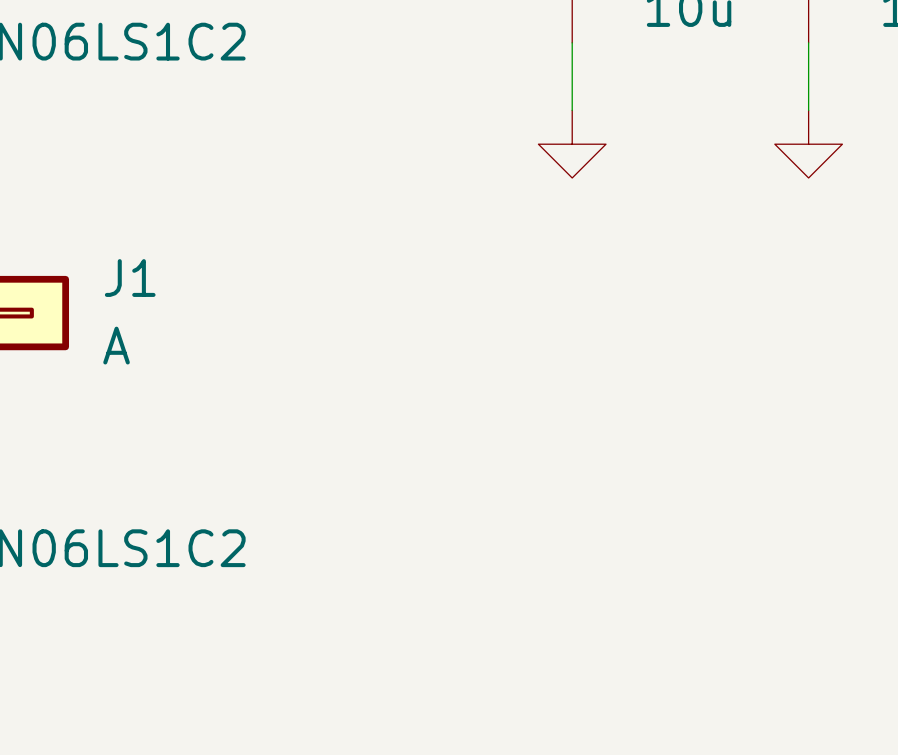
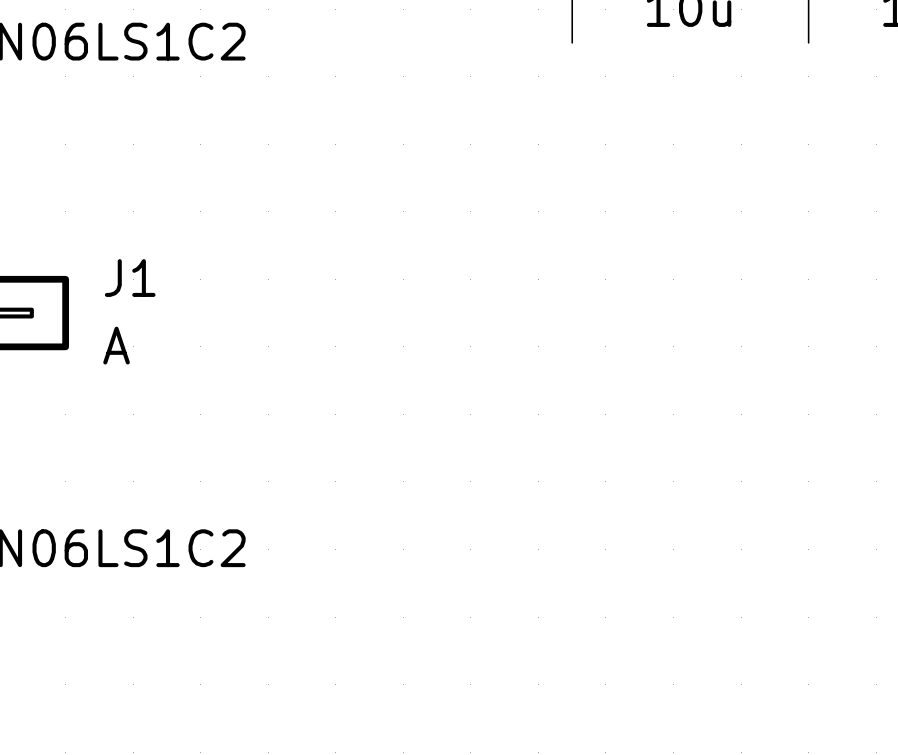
wire: (572, 42) (572, 110) -> none
wire: (808, 42) (808, 110) -> none
power symbol: (572, 144) -> none
power symbol: (808, 144) -> none

